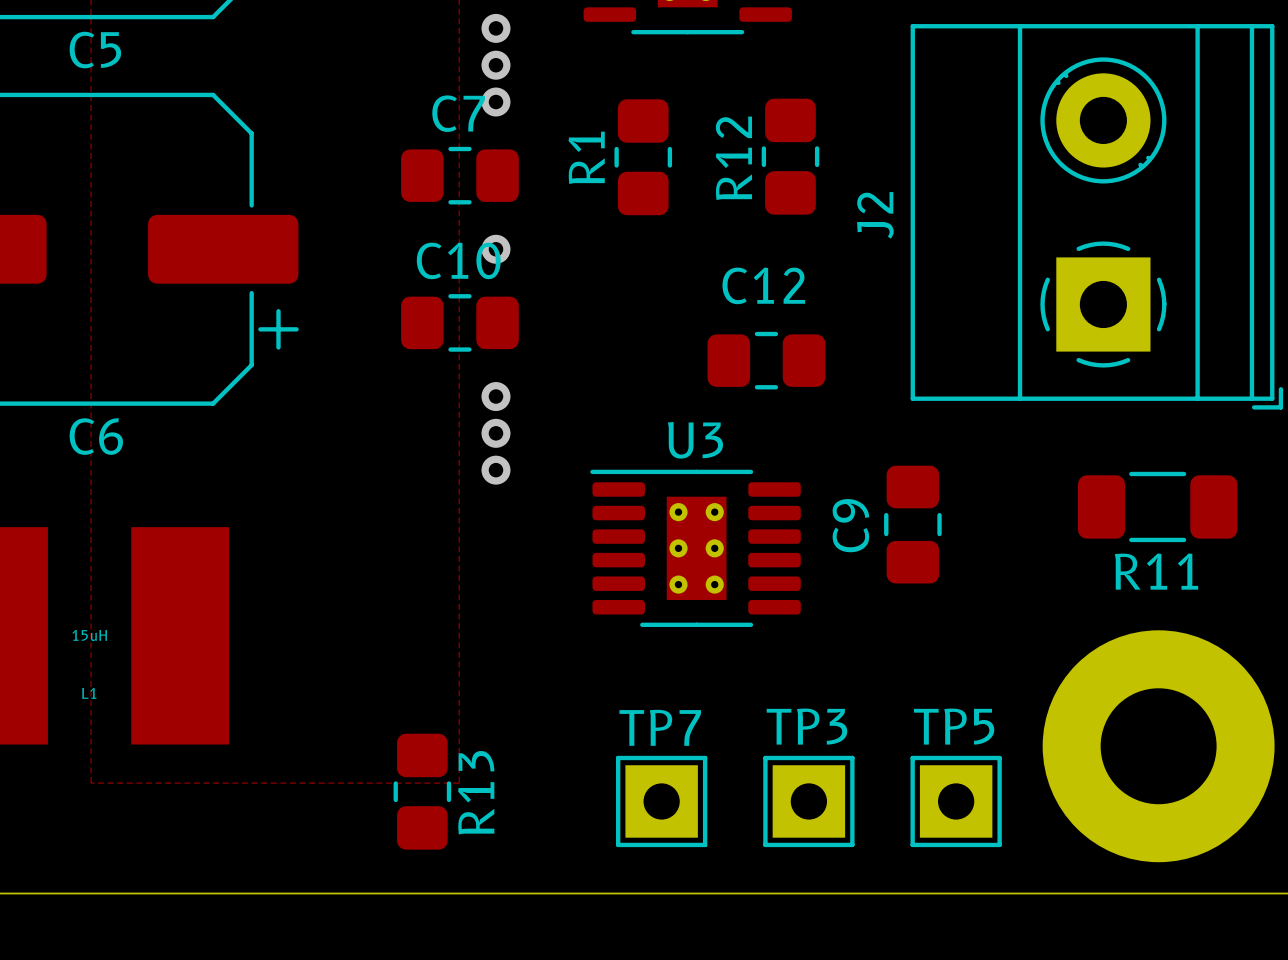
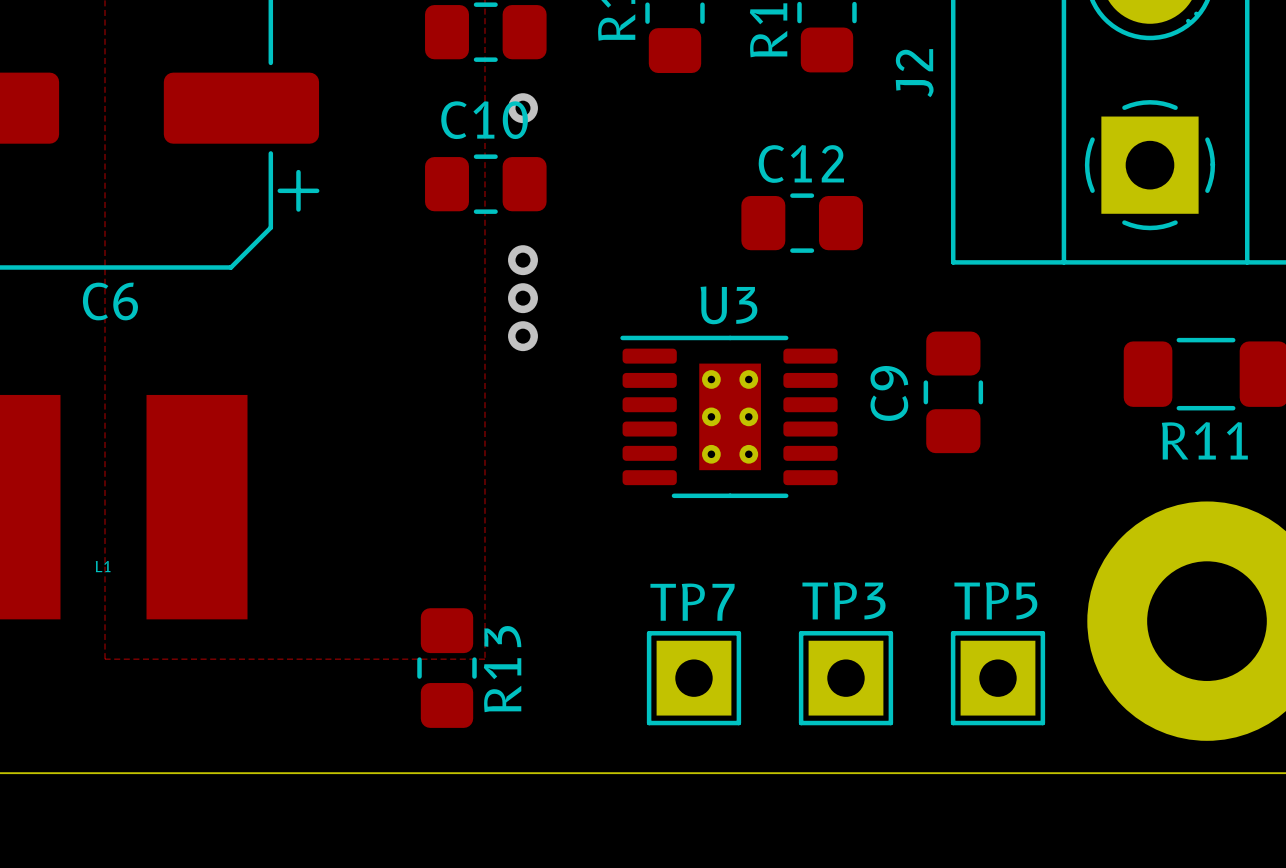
C12 name position: C12 (763, 285) -> C12 (801, 163)
L1 value: 15uH (89, 635) -> none

